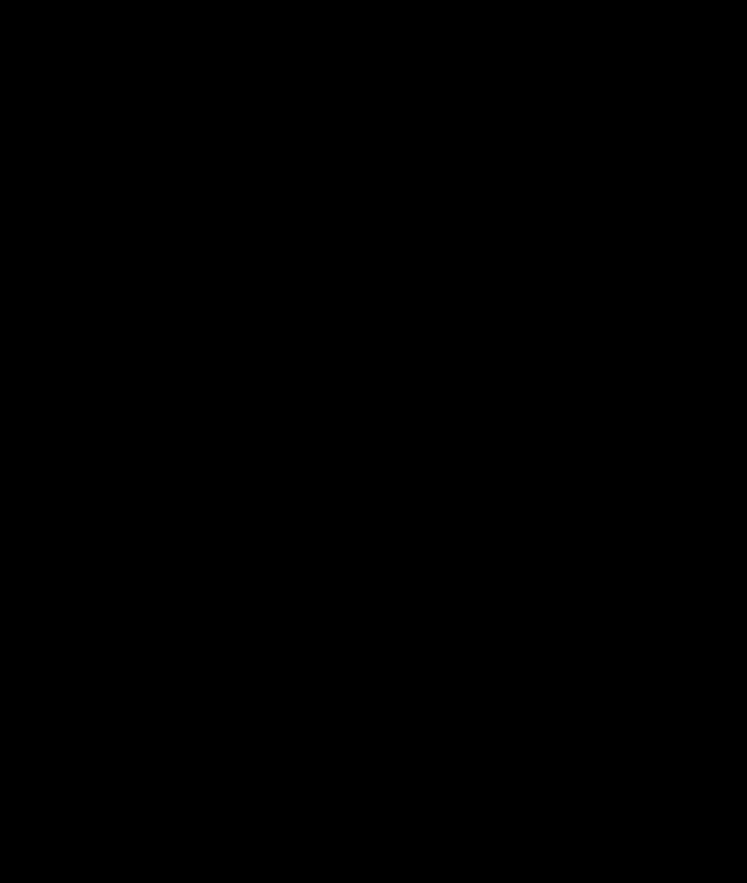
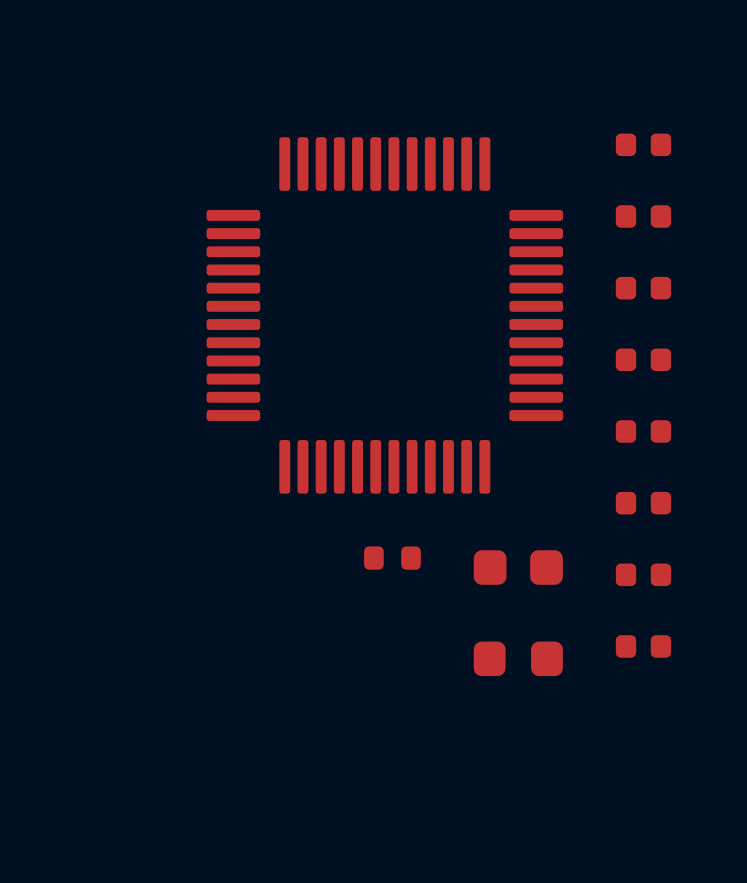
part: none -> (643, 144)
part: none -> (643, 216)
part: none -> (643, 288)
part: none -> (384, 315)
part: none -> (643, 359)
part: none -> (643, 431)
part: none -> (643, 503)
part: none -> (392, 558)
part: none -> (518, 567)
part: none -> (643, 574)
part: none -> (643, 646)
part: none -> (518, 658)

